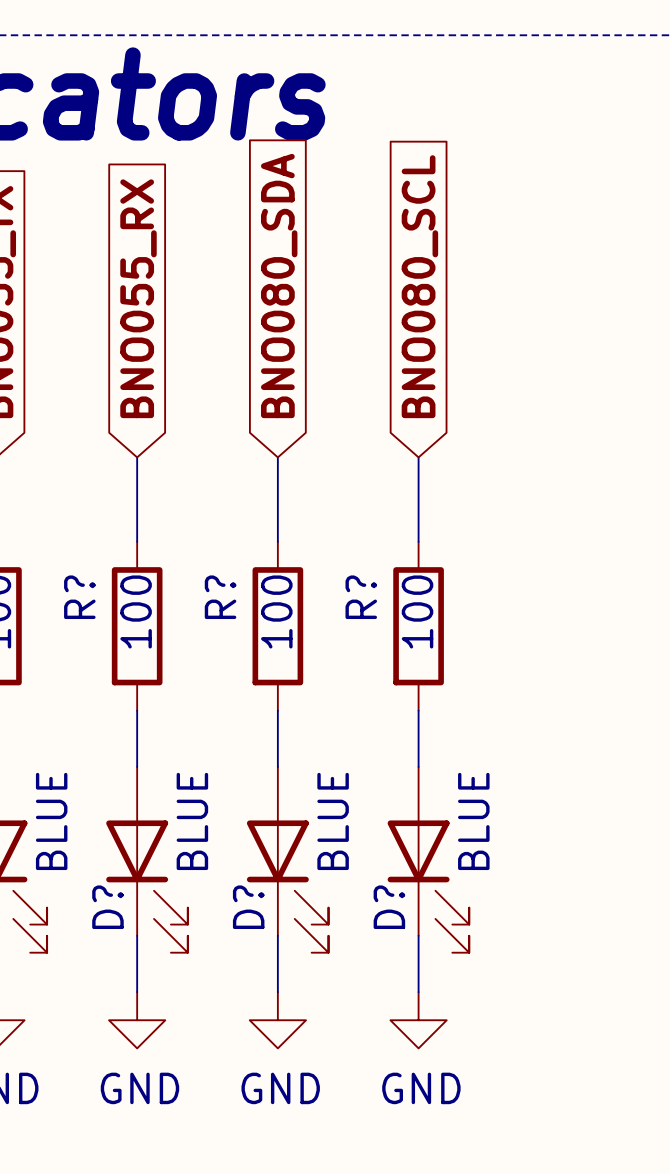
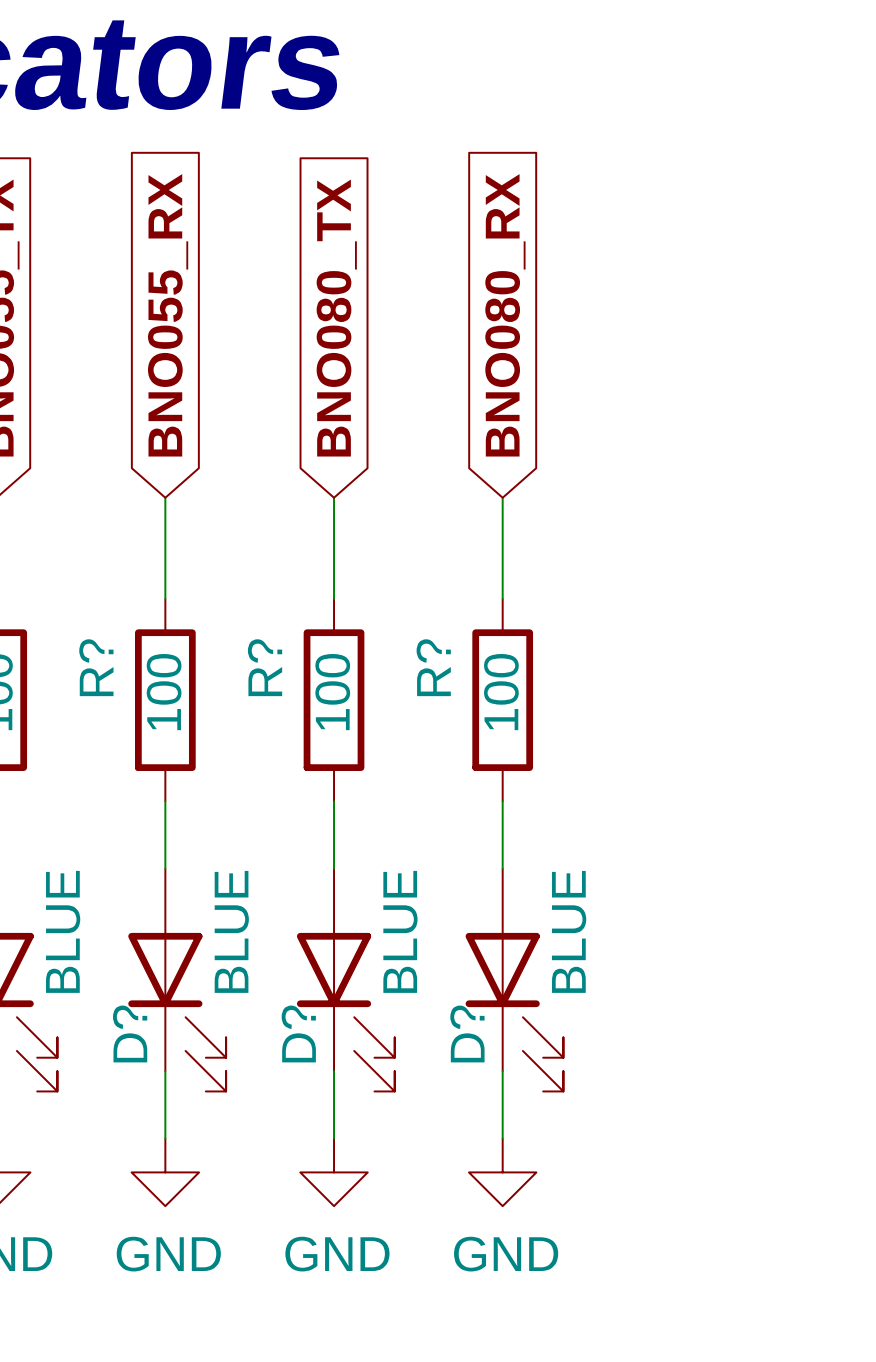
global label: BNO080_SDA (279, 286) -> BNO080_TX (336, 318)
global label: BNO080_SCL (419, 286) -> BNO080_RX (505, 315)

